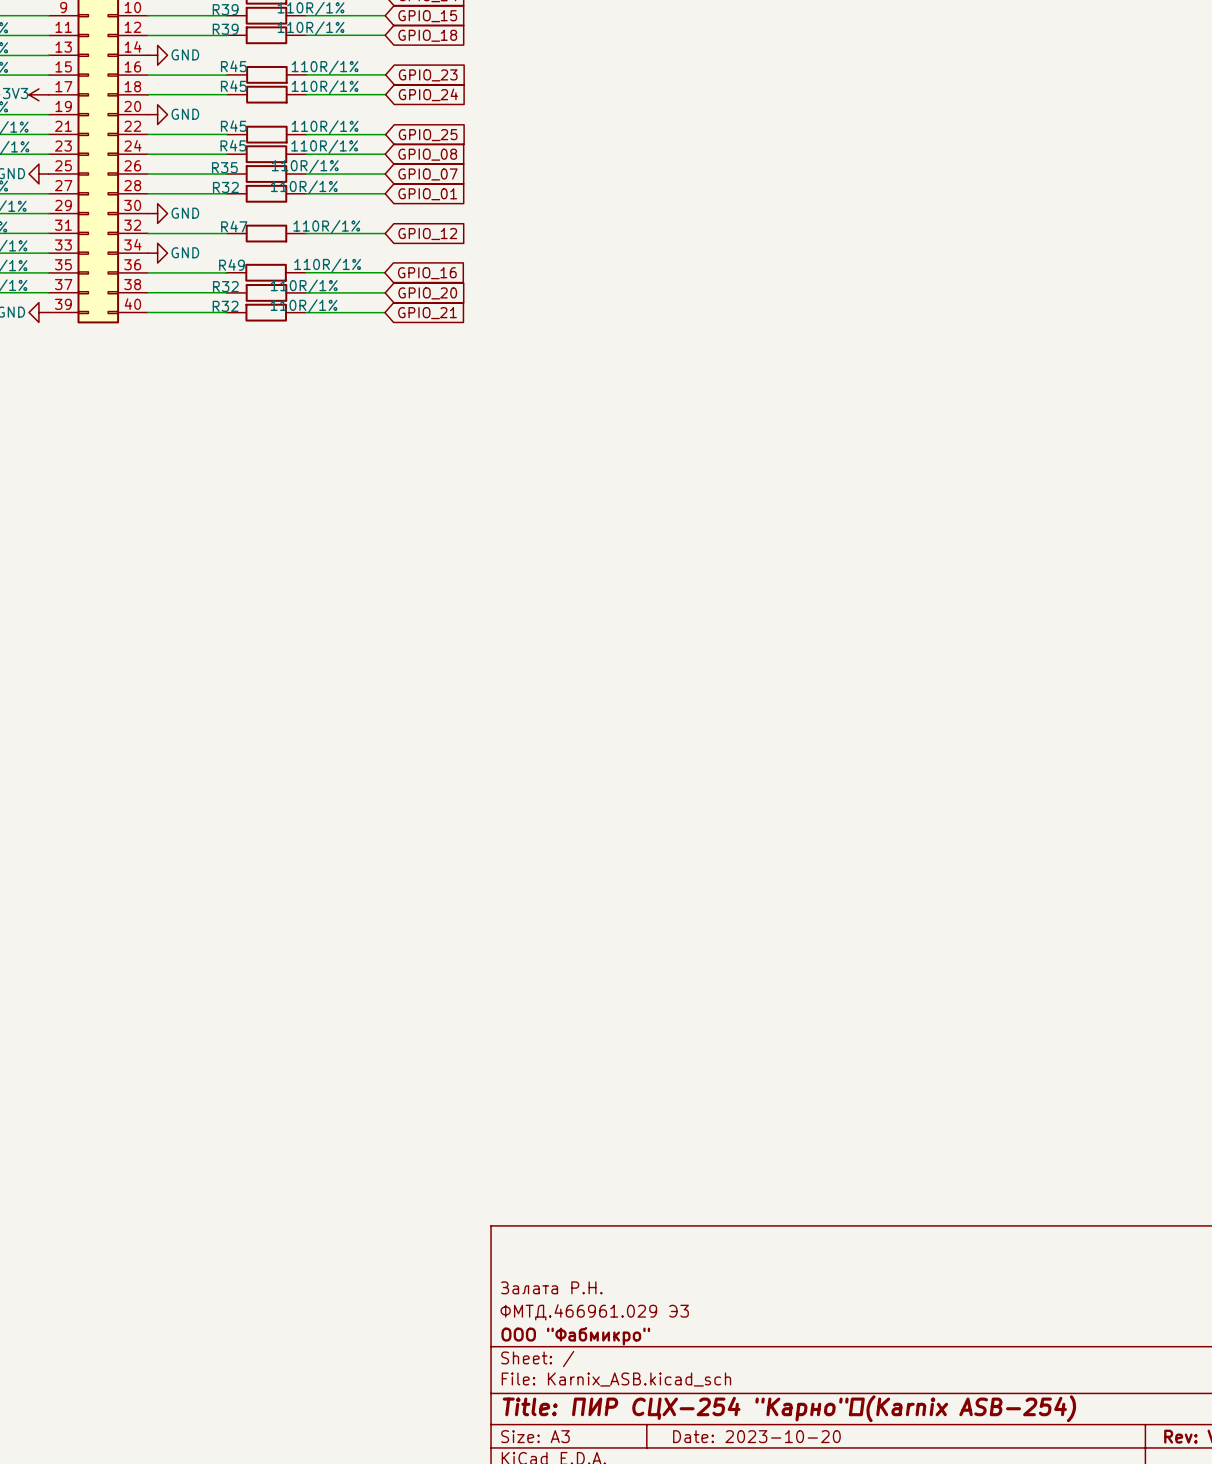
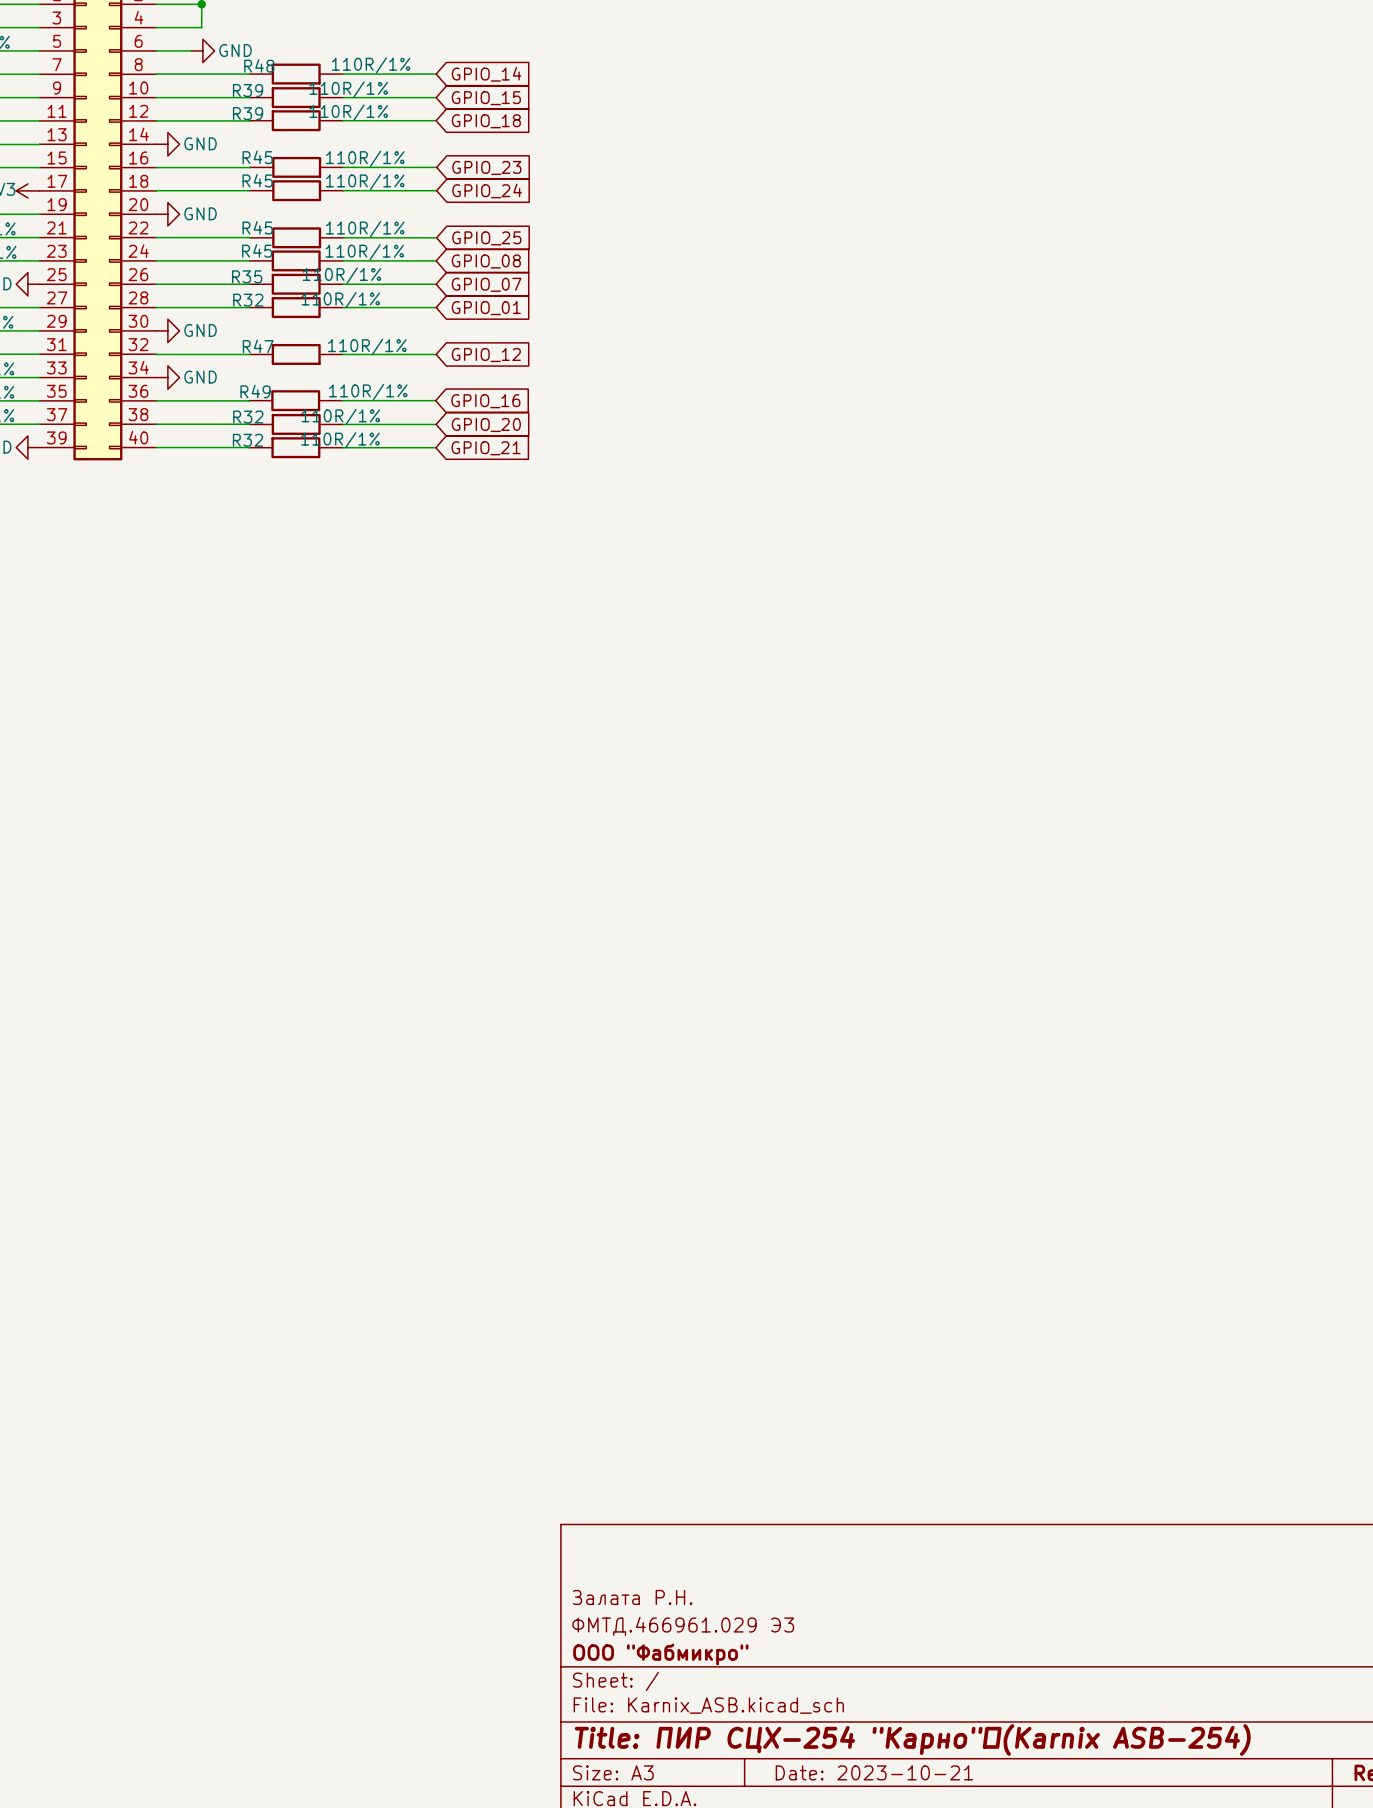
title block: Date: 2023-10-20 (756, 1436) -> Date: 2023-10-21 (874, 1772)

